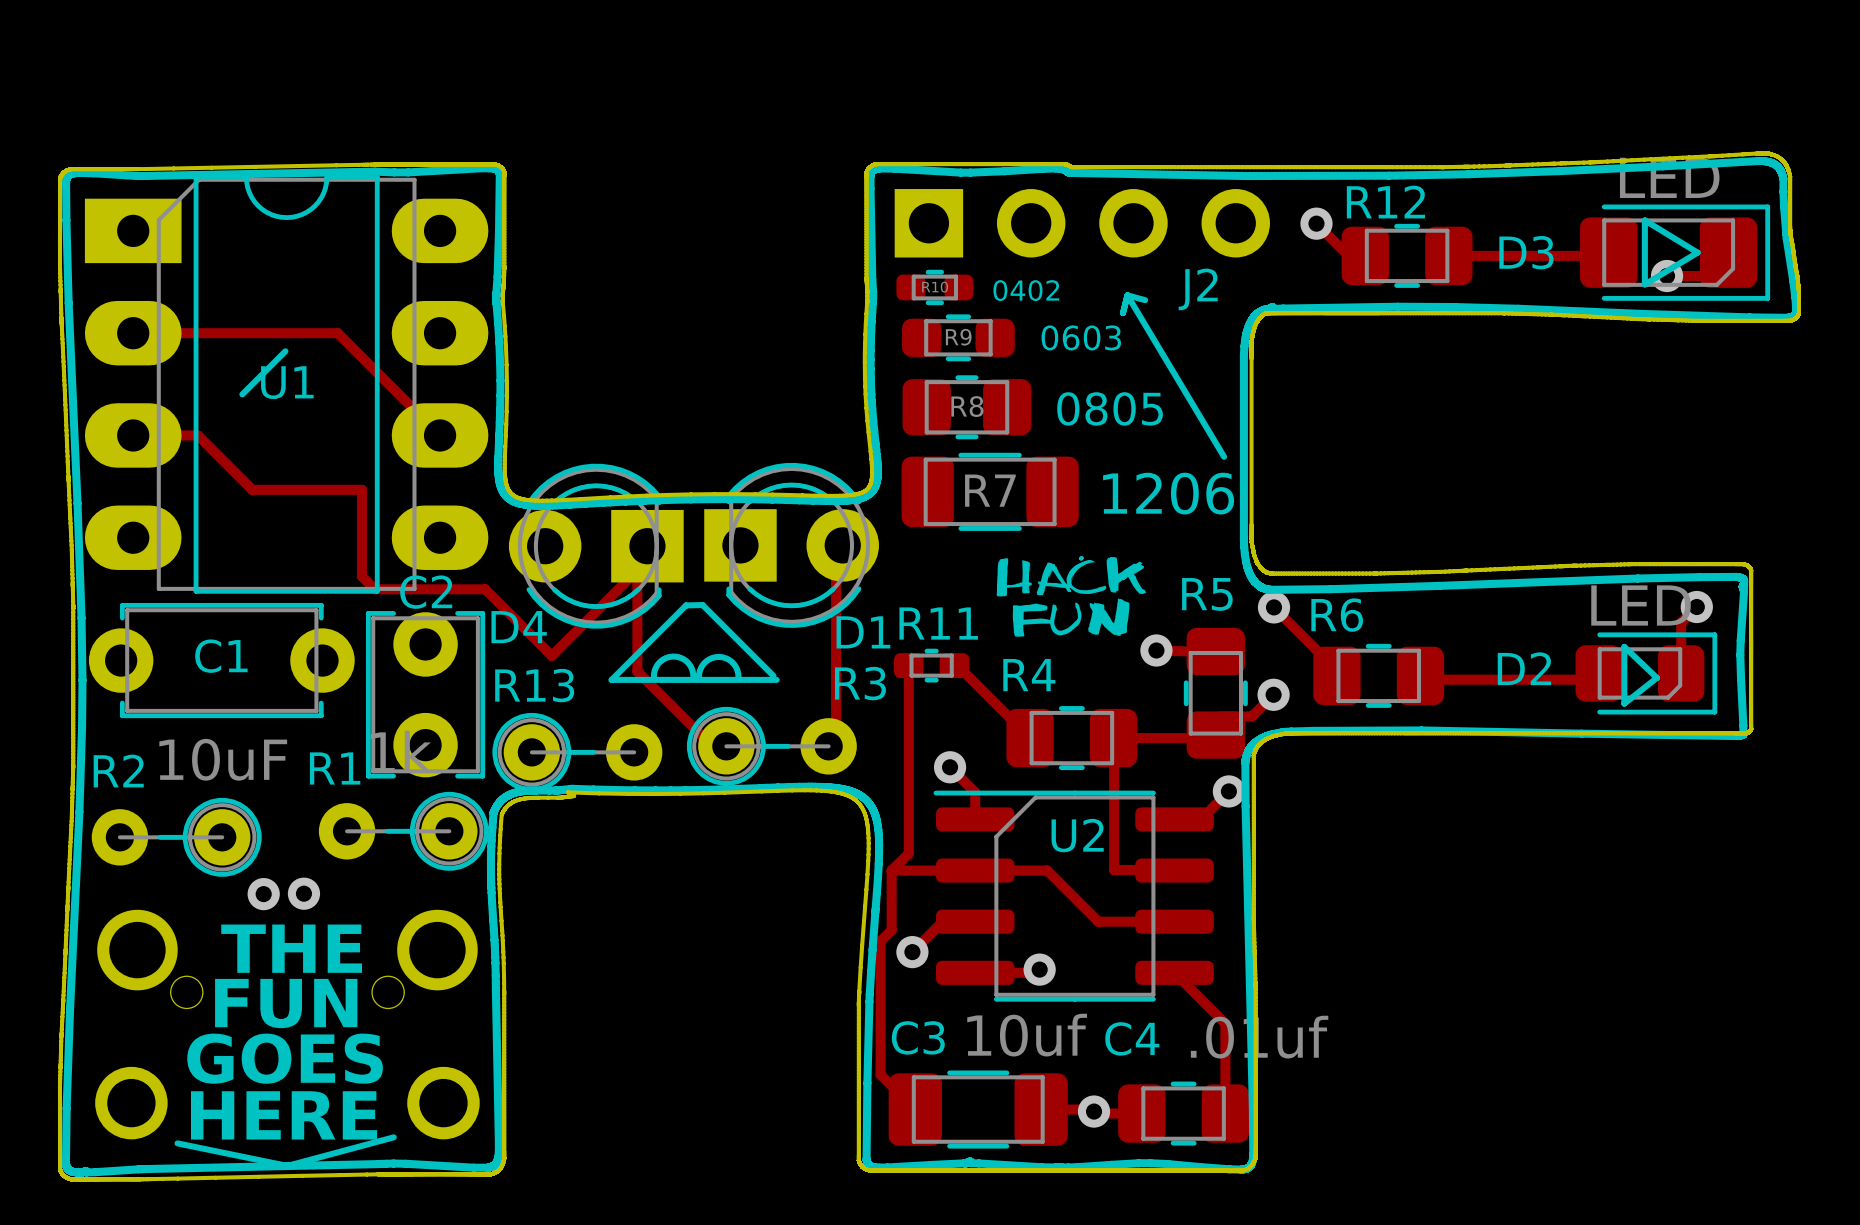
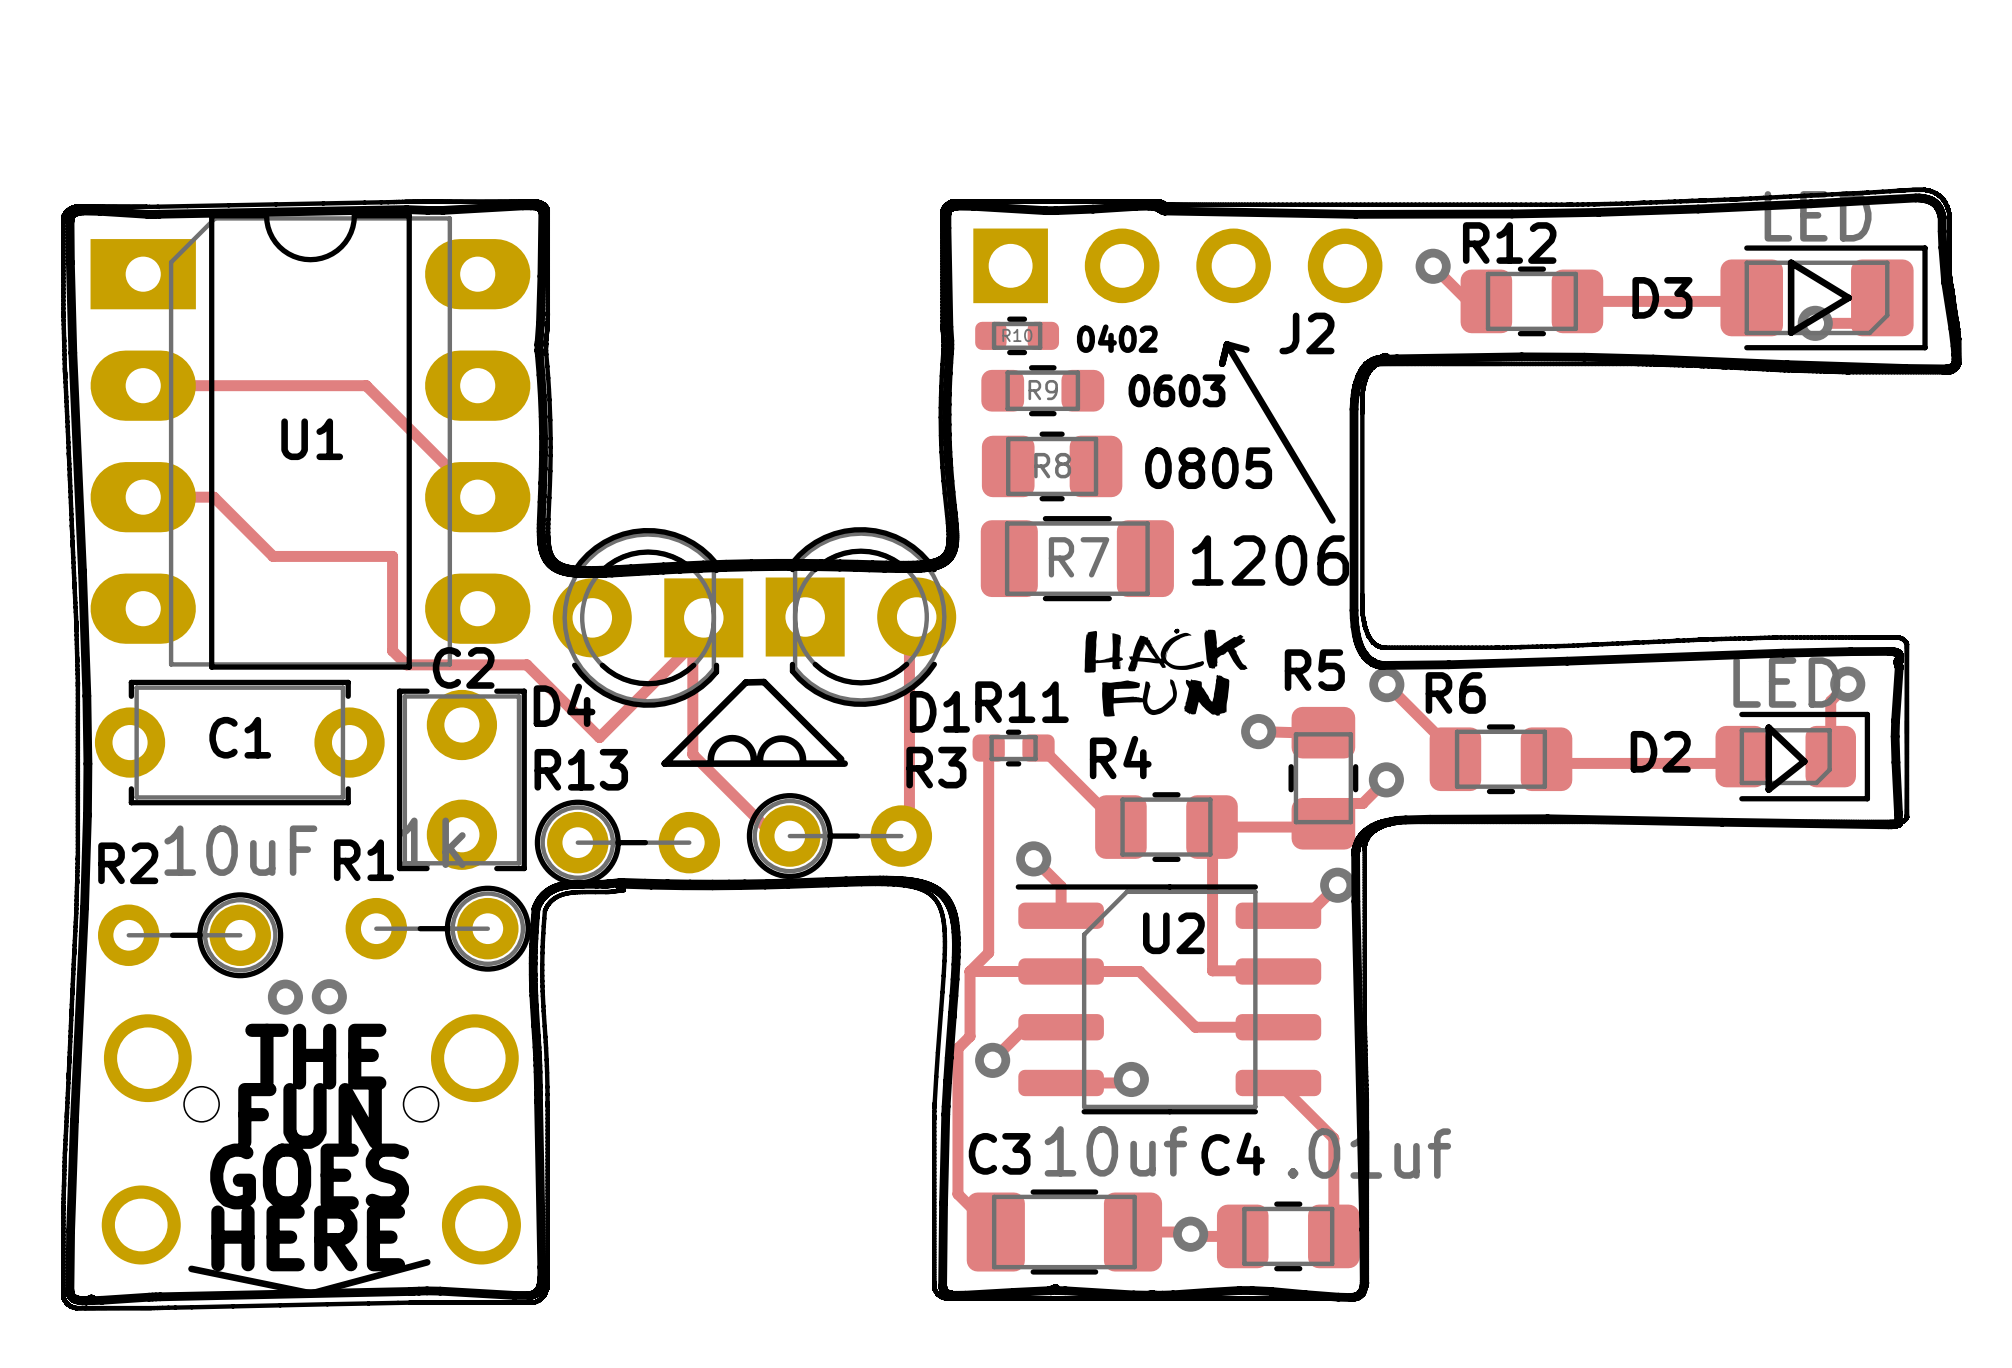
line: (285, 351) (242, 394) -> none

